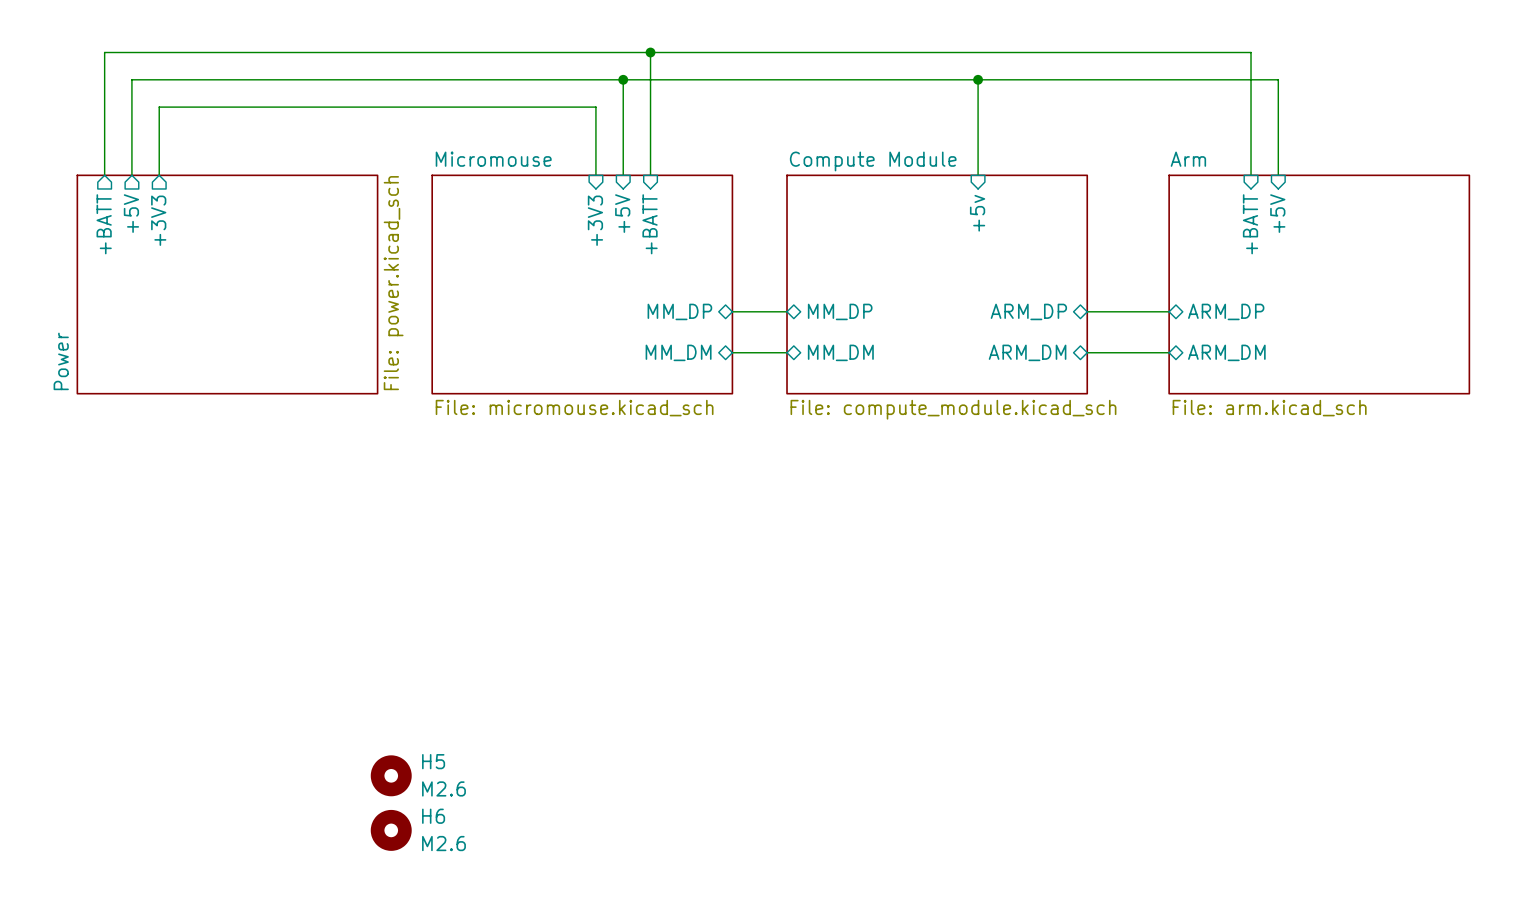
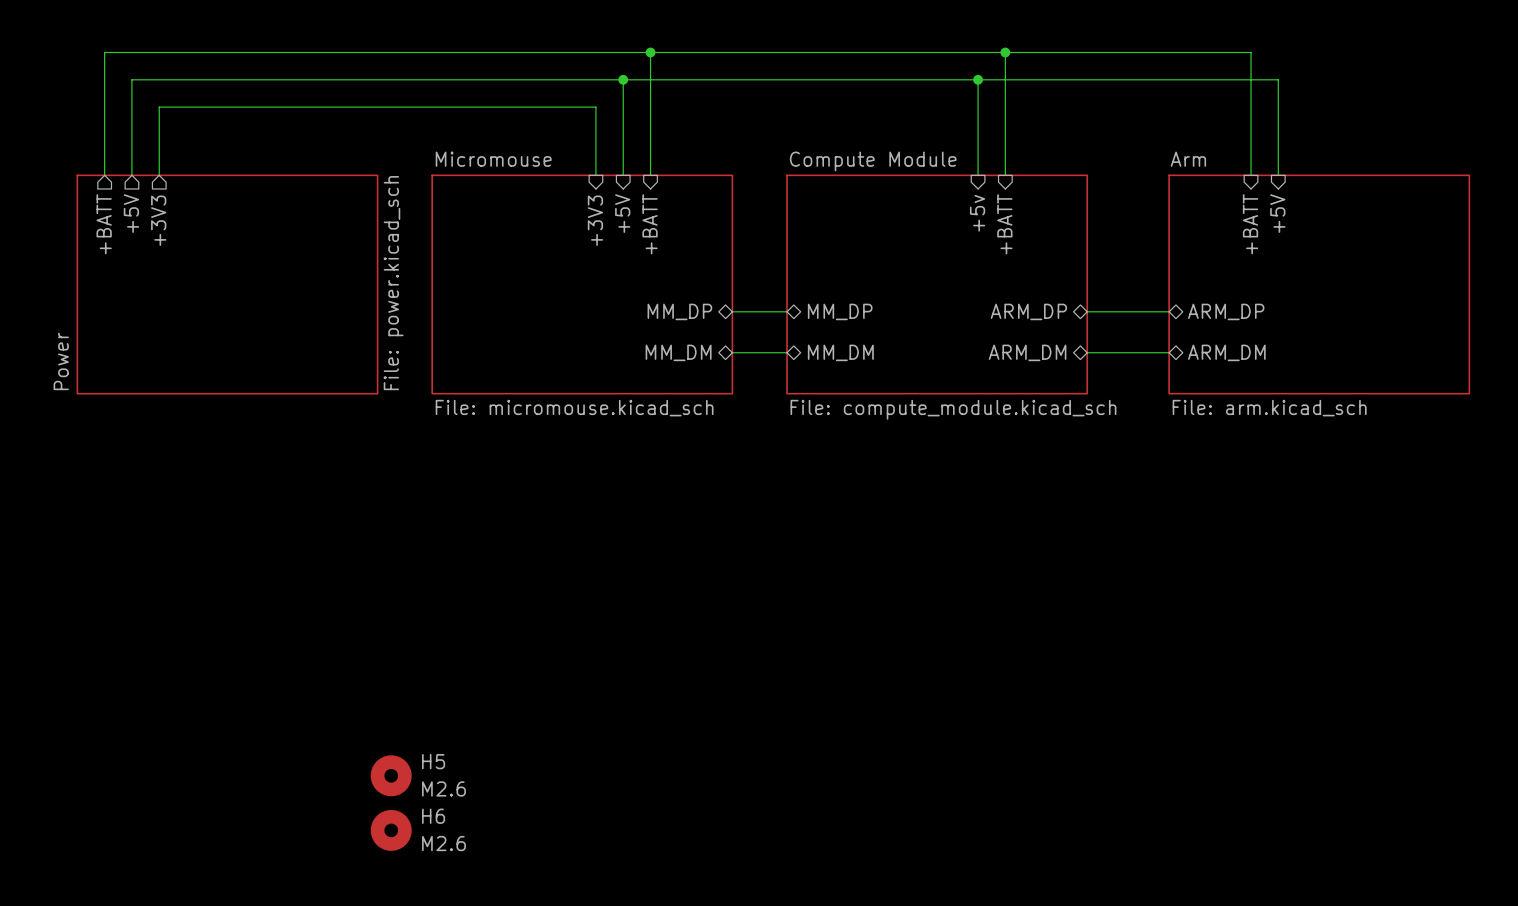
wire: none -> (1005, 52) (1005, 175)
junction: none -> (1005, 52)
sheet pin: none -> +BATT (1004, 224)

